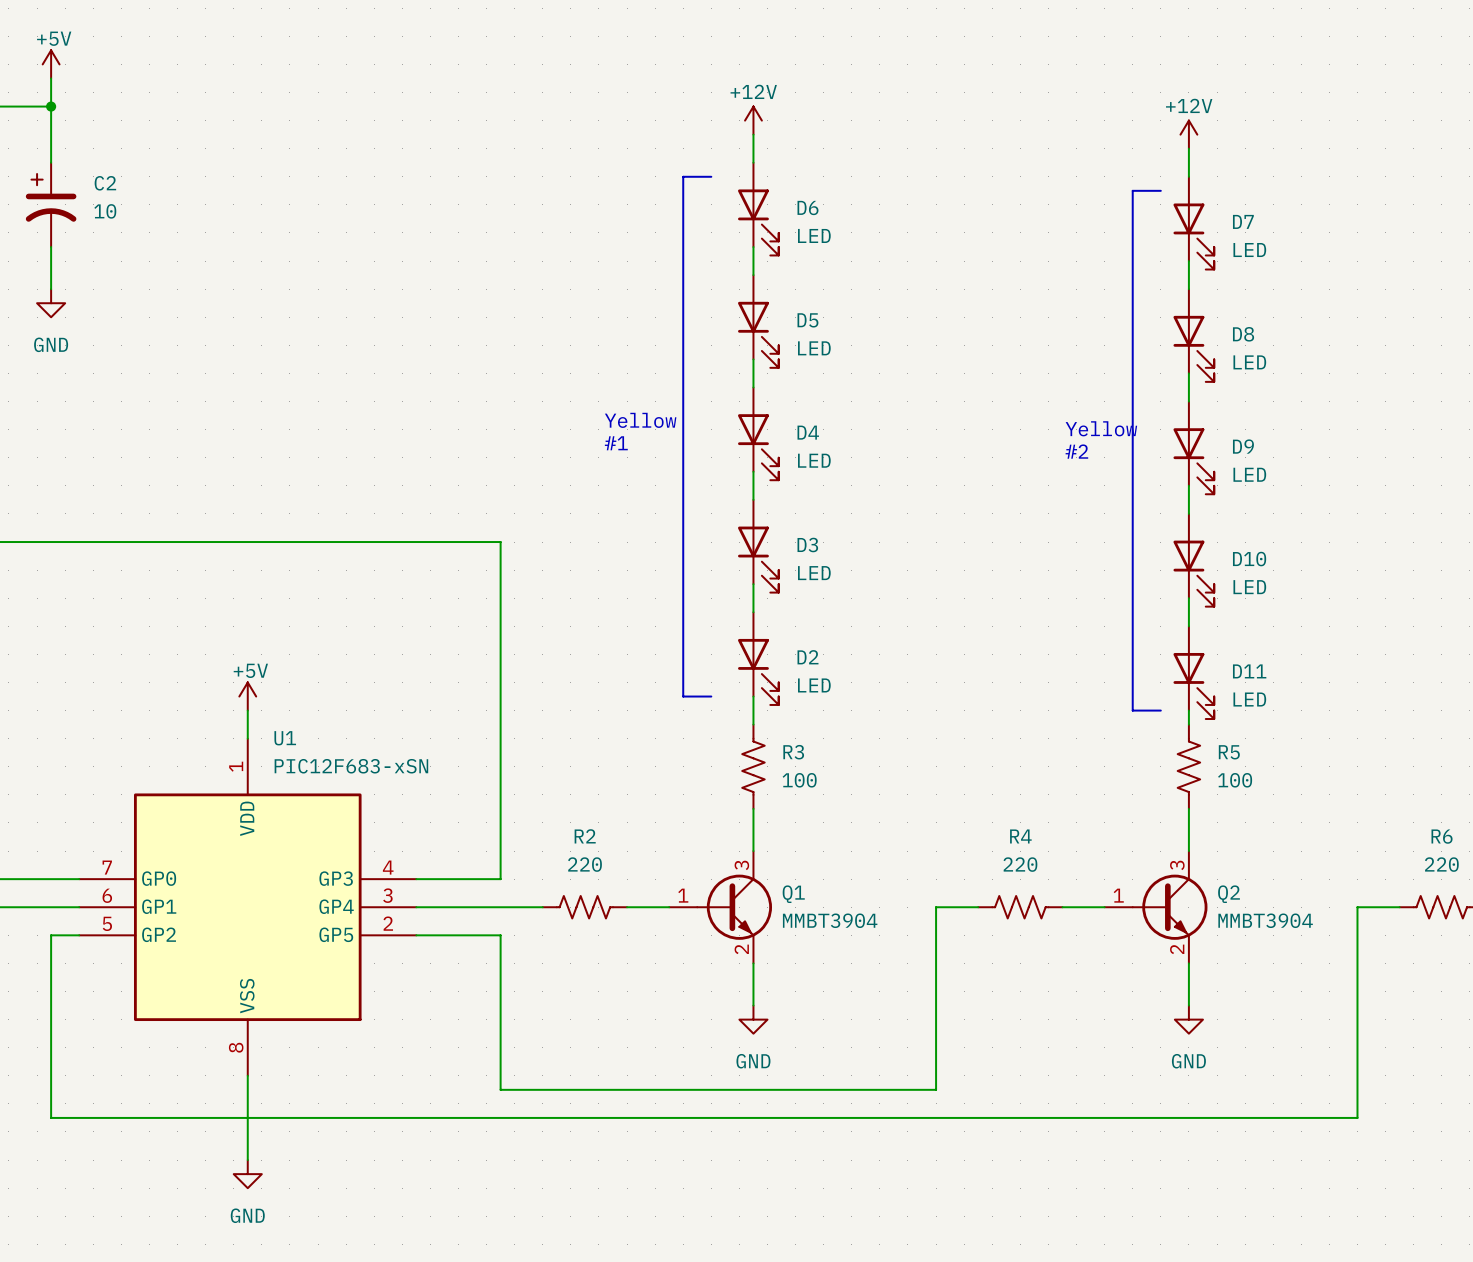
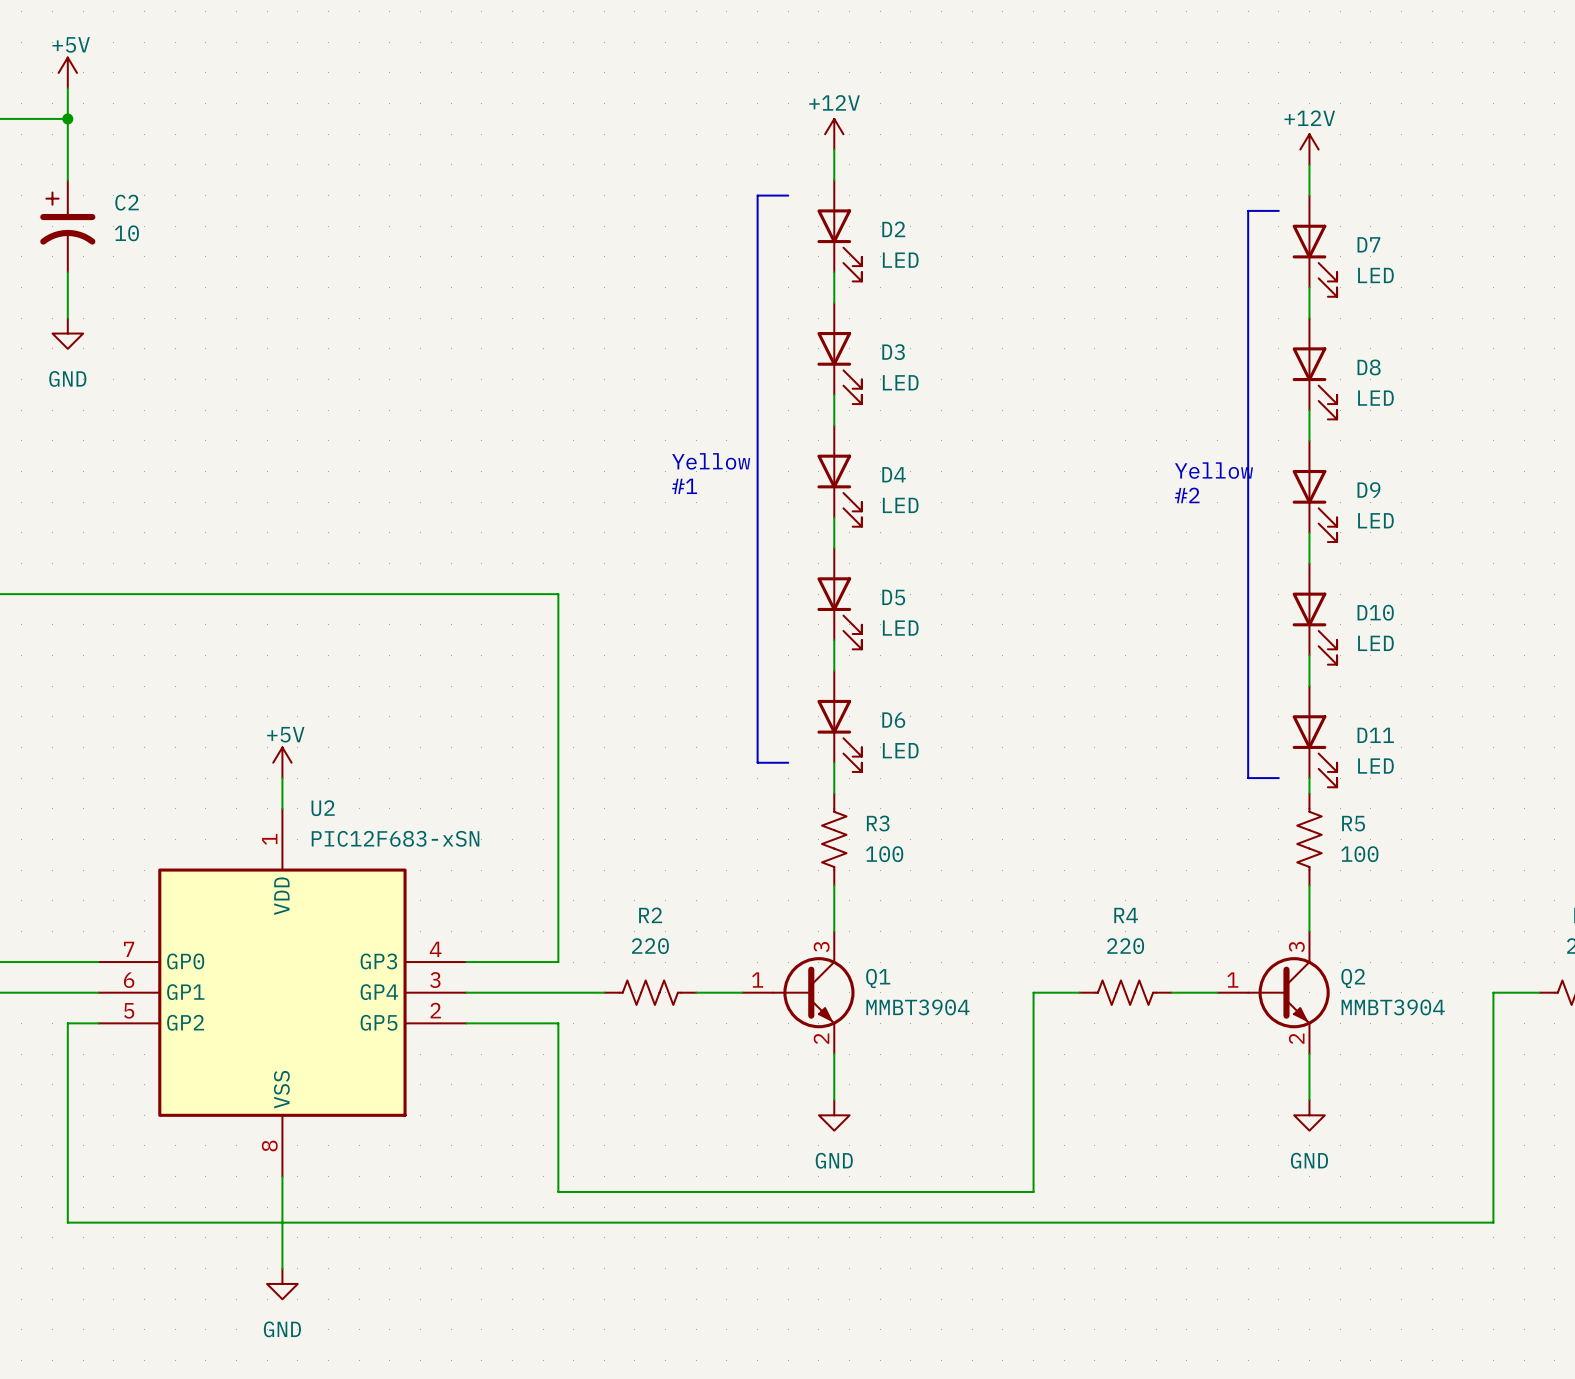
D6 name: D6 (807, 208) -> D2 (893, 229)
D5 name: D5 (807, 320) -> D3 (893, 352)
D3 name: D3 (807, 545) -> D5 (893, 597)
D2 name: D2 (808, 657) -> D6 (893, 720)
U1 name: U1 (285, 738) -> U2 (323, 808)

